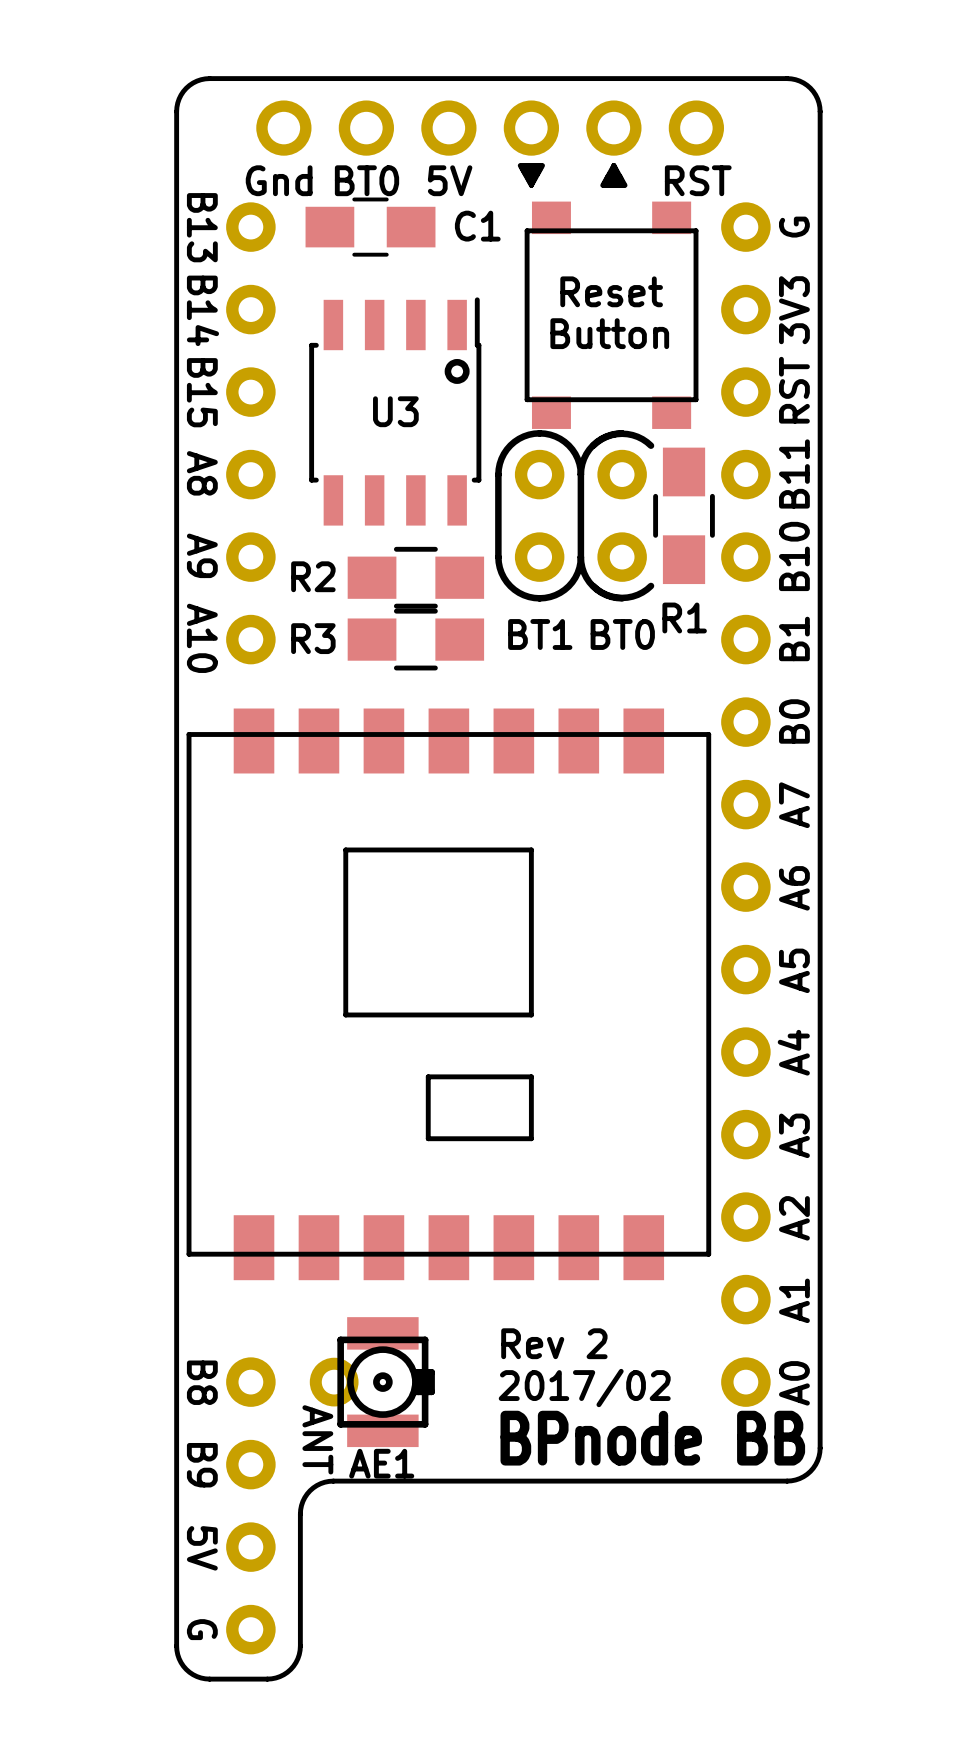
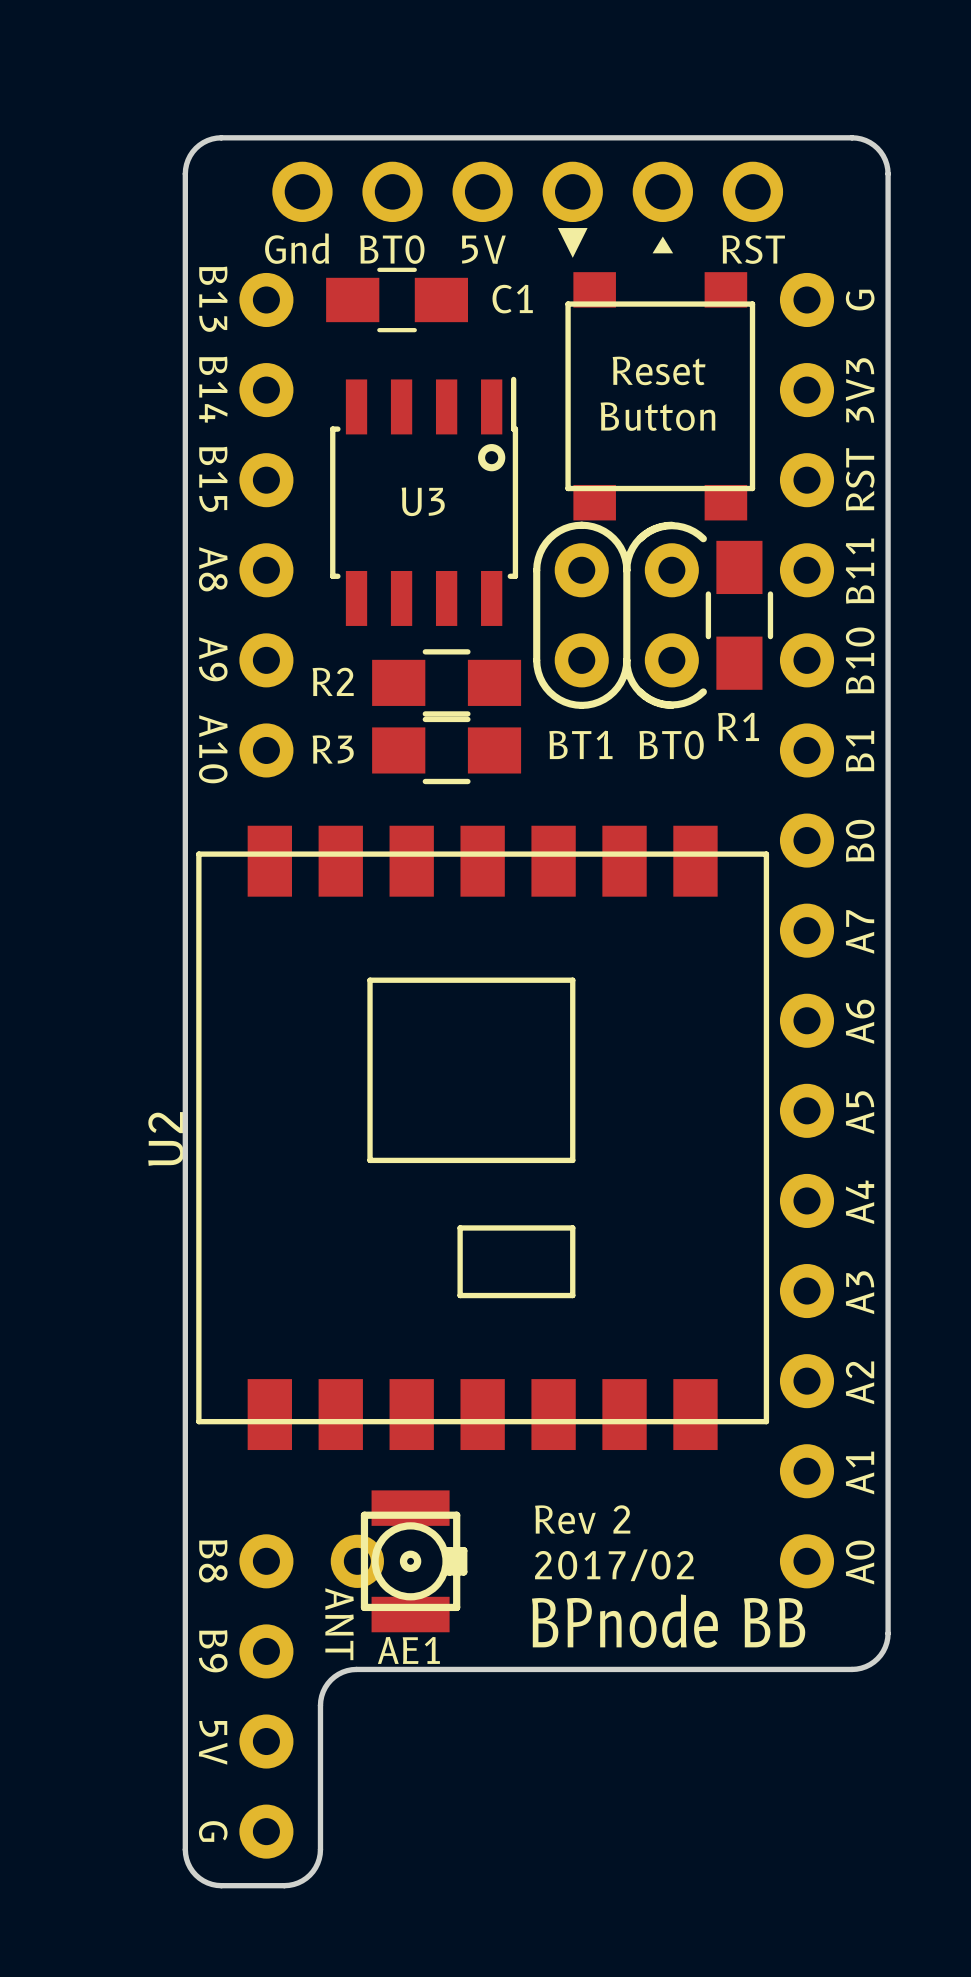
U2 name: none -> U2 (166, 1138)

